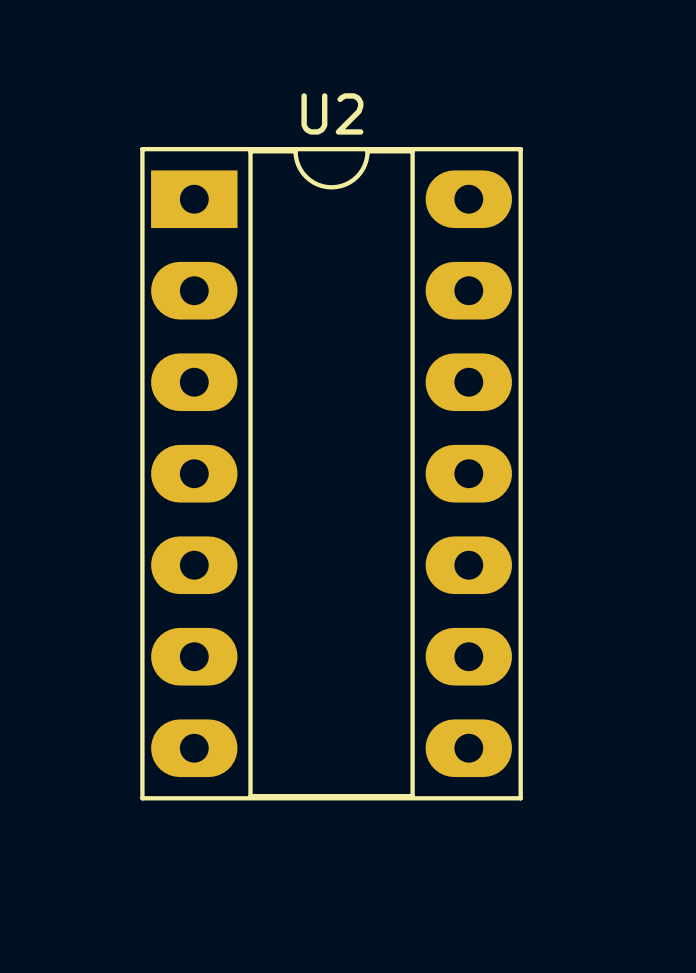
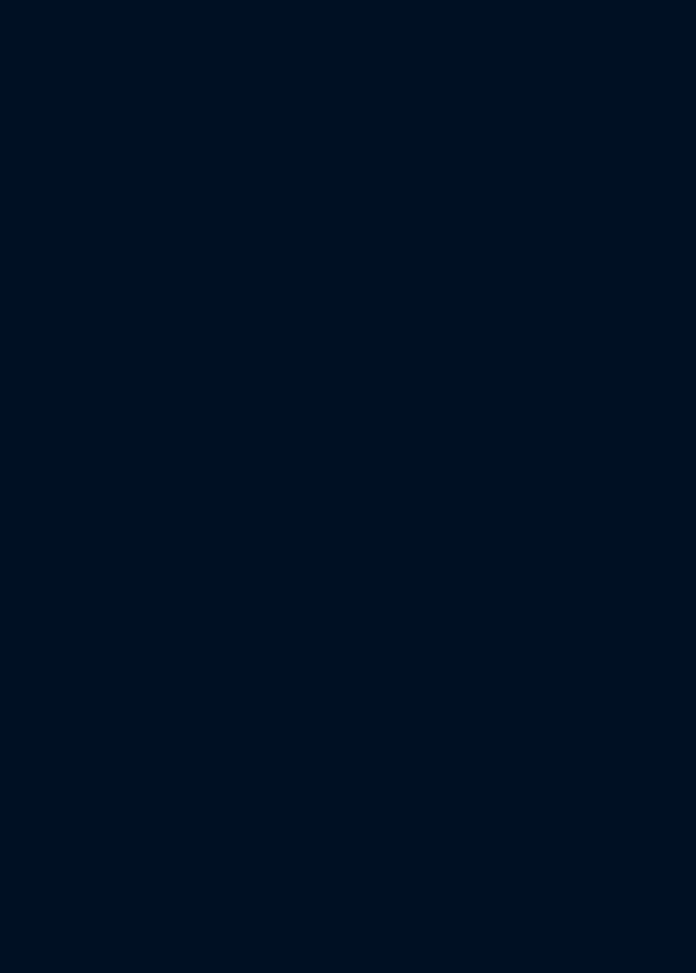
U2: (331, 473) -> none

